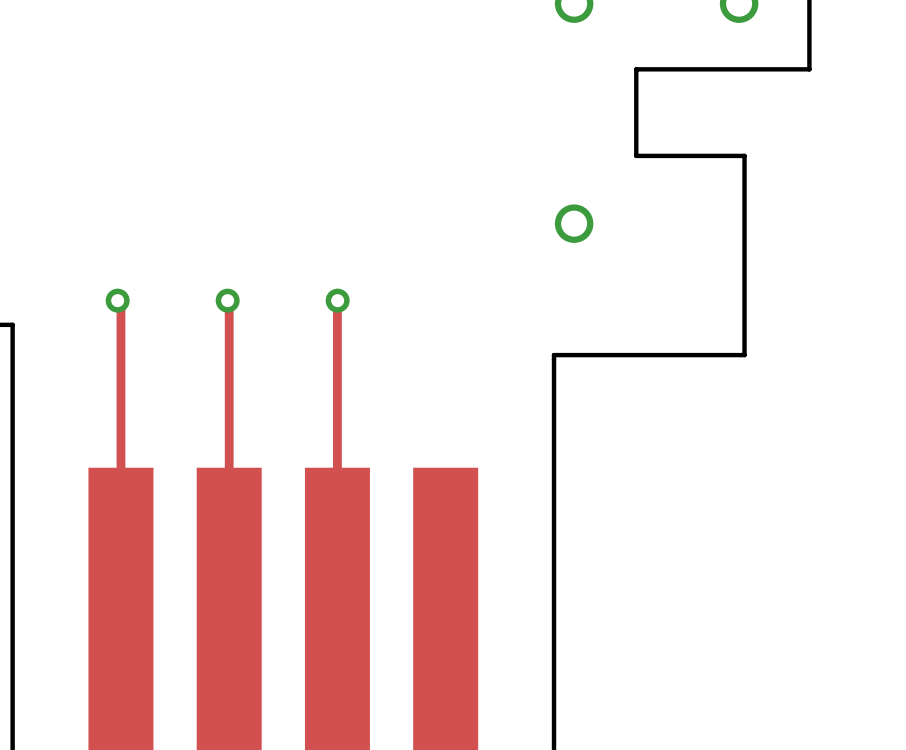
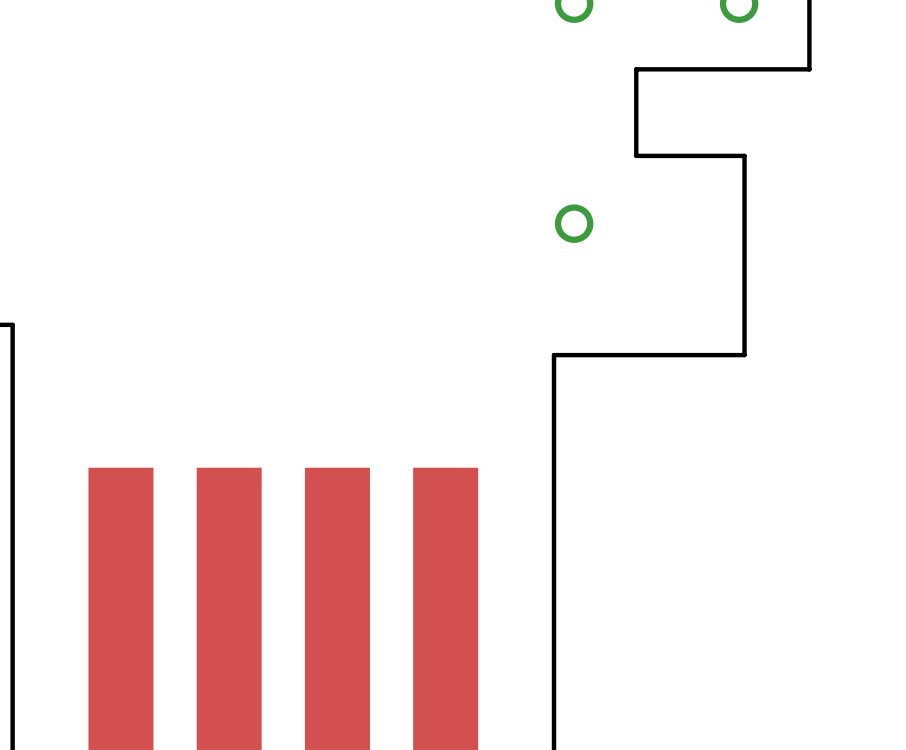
track: (117, 300) (120, 303) (120, 619) -> none
via: (117, 300) -> none
track: (227, 300) (229, 302) (229, 619) -> none
via: (227, 300) -> none
track: (337, 300) (337, 619) -> none
via: (337, 300) -> none

